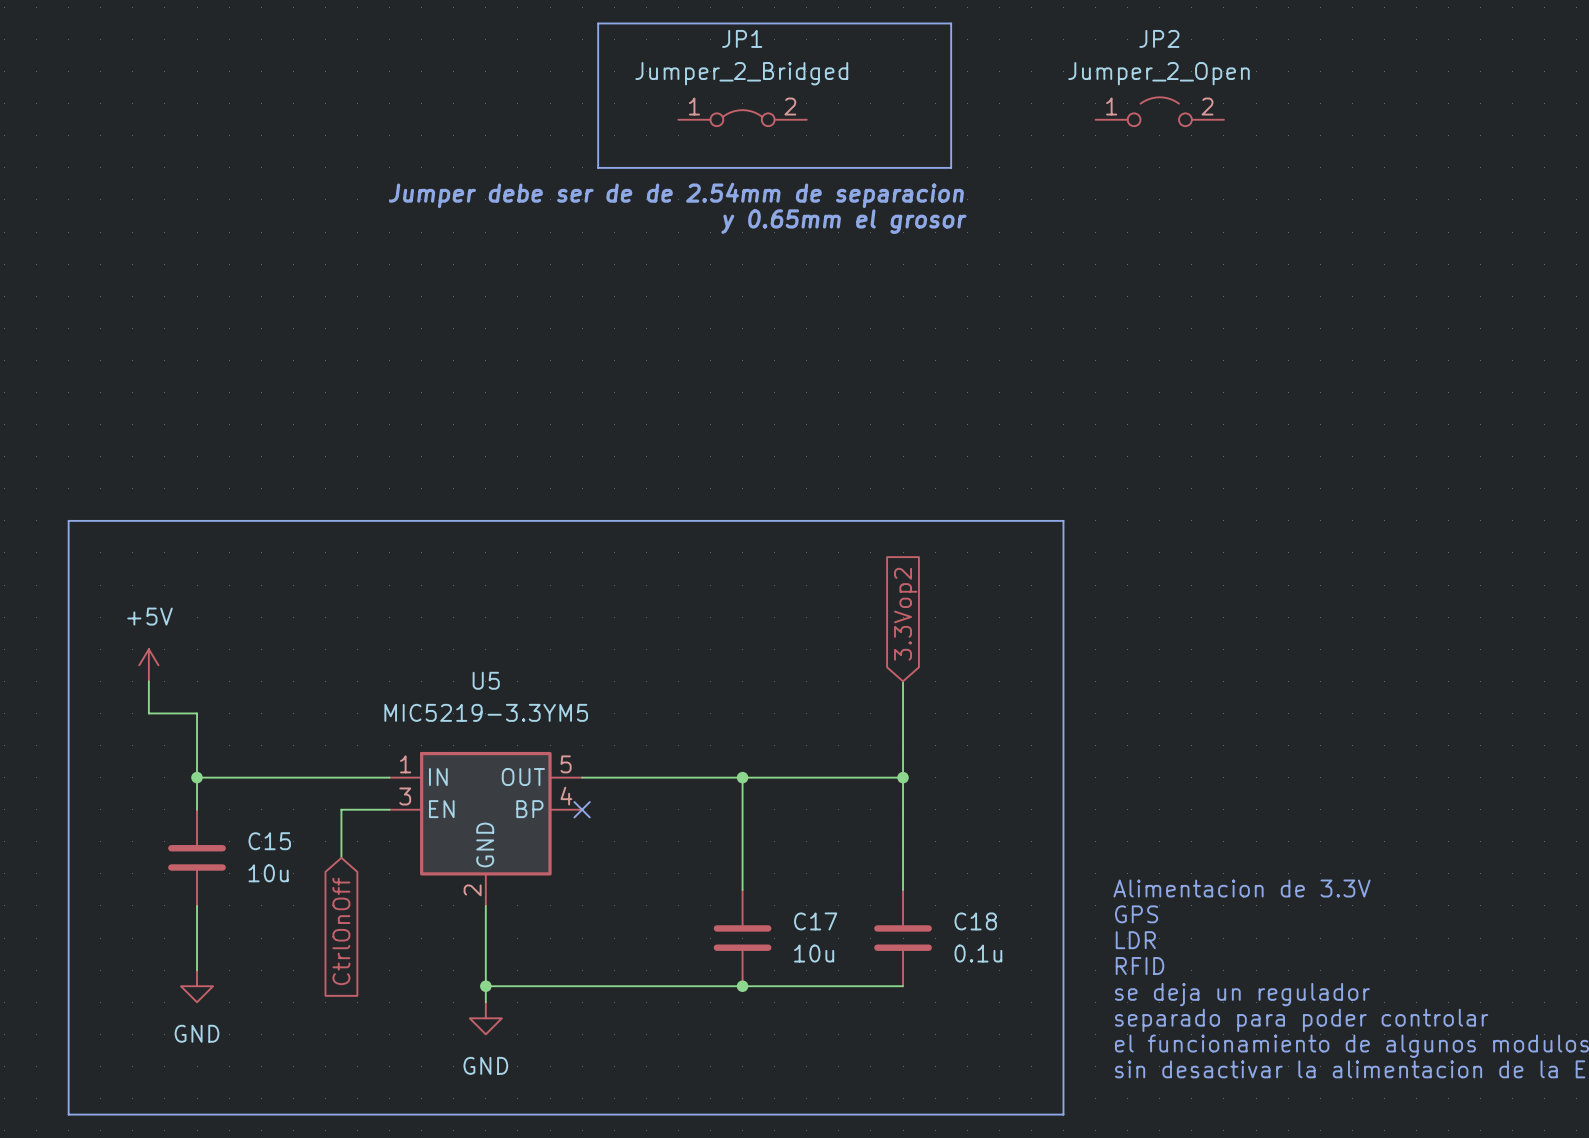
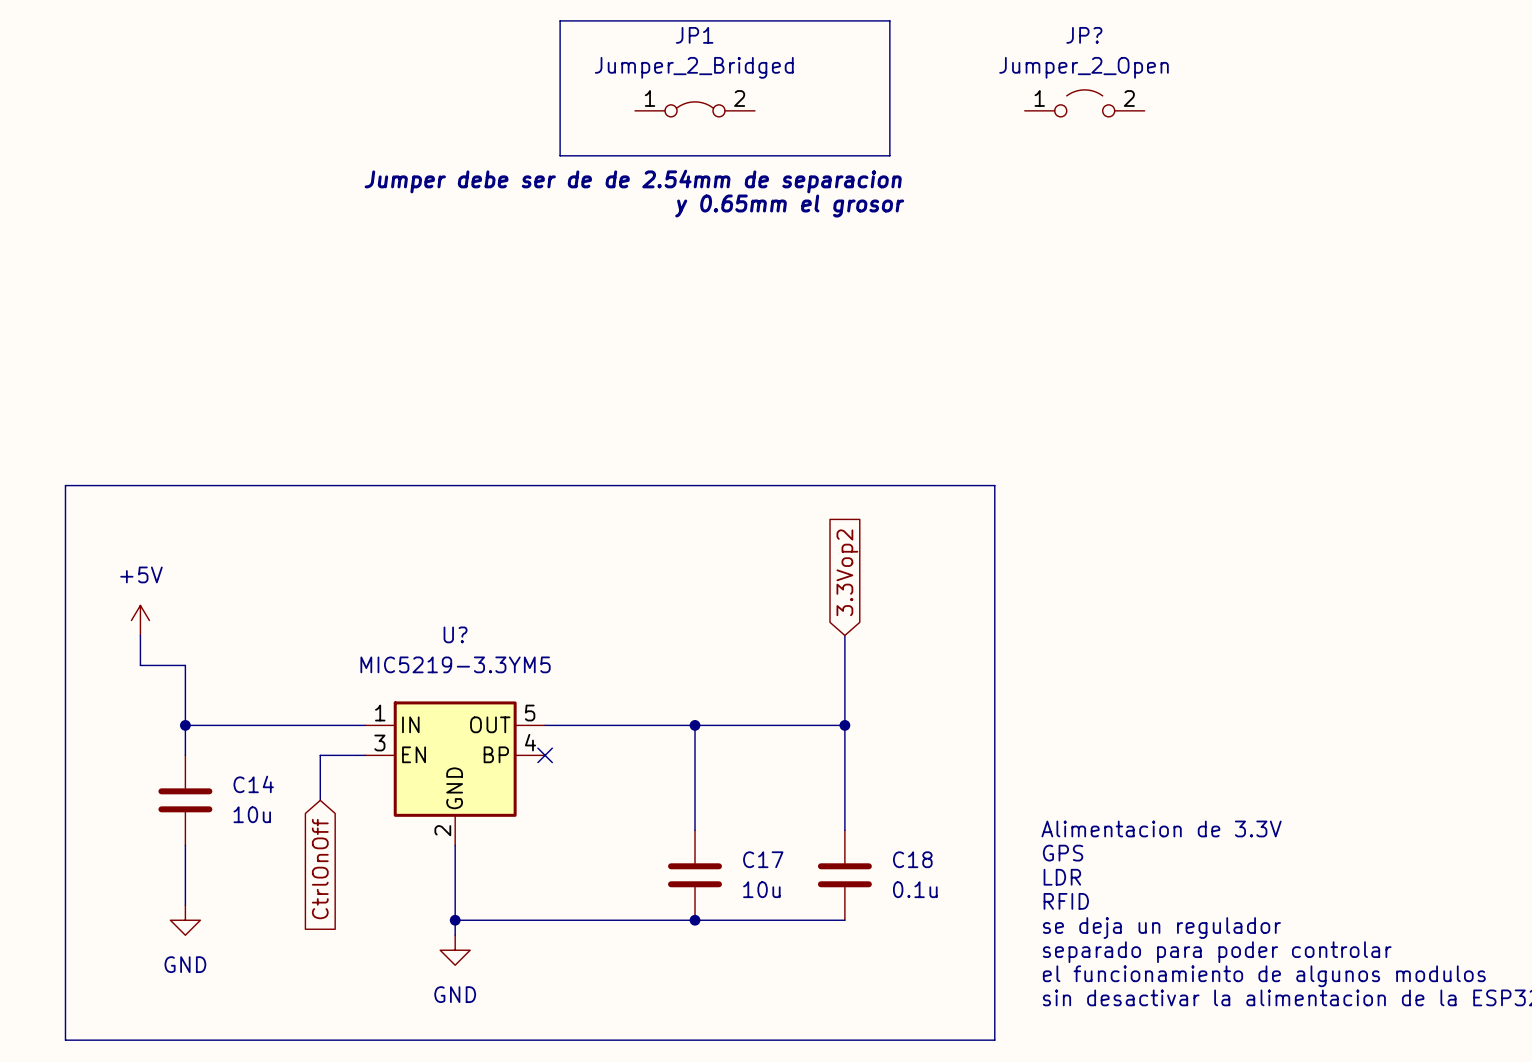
JP2 name: JP2 (1159, 38) -> JP? (1084, 35)
U5 name: U5 (486, 680) -> U? (455, 634)
C15 name: C15 (269, 841) -> C14 (253, 784)

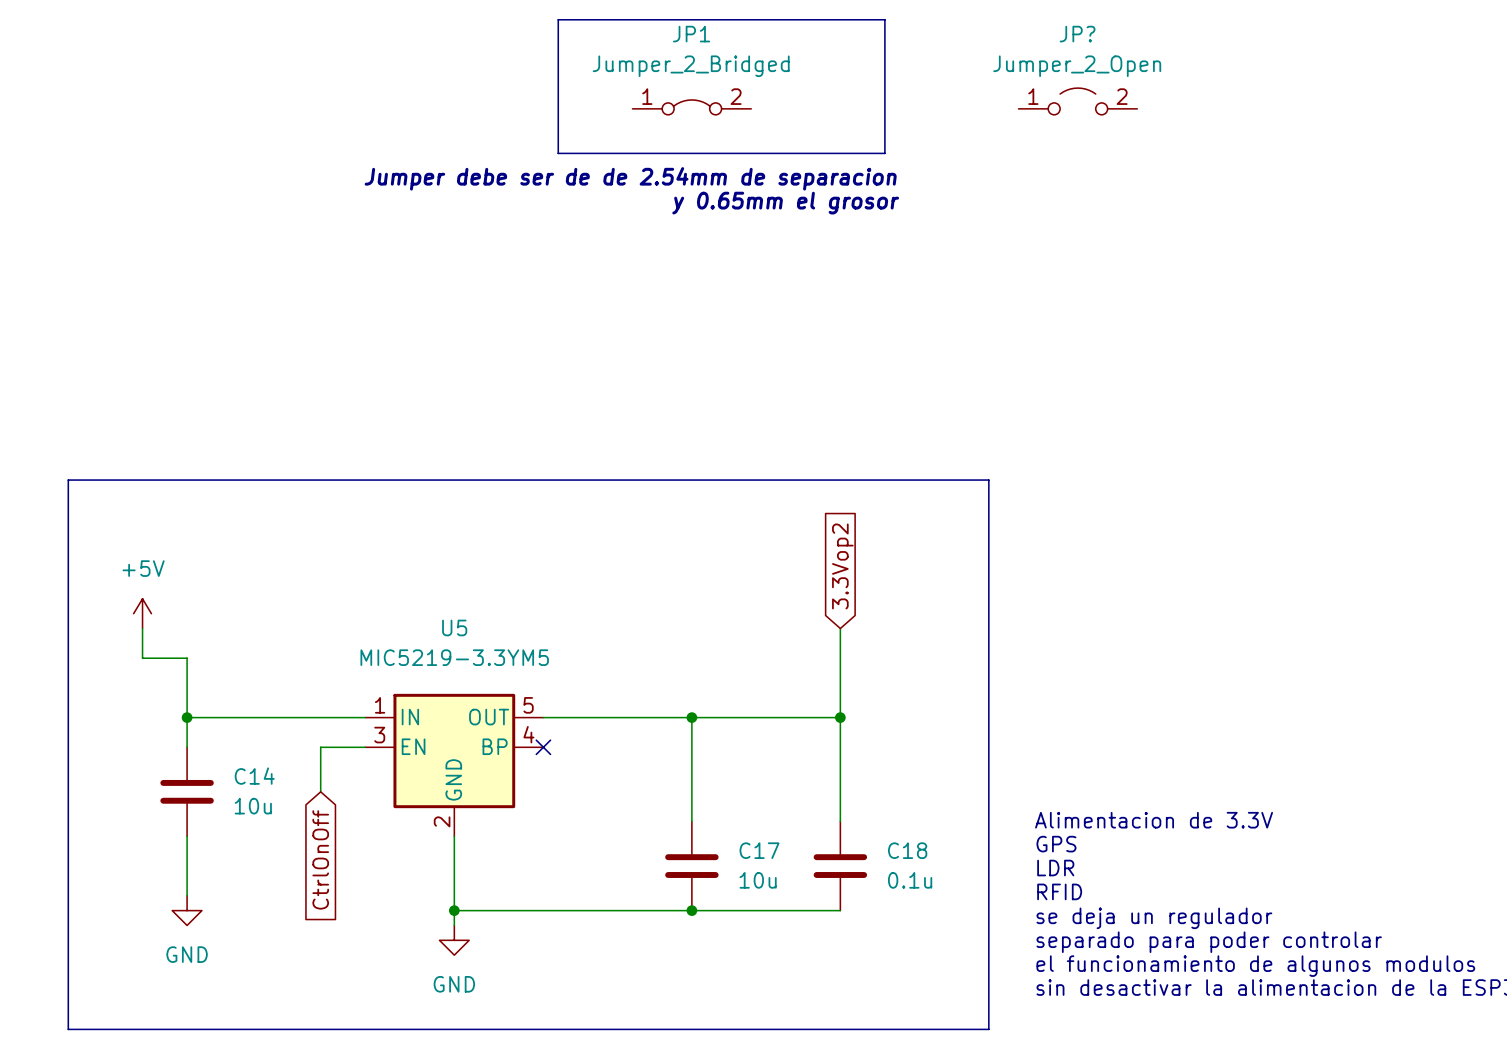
U? name: U? (455, 634) -> U5 (454, 627)

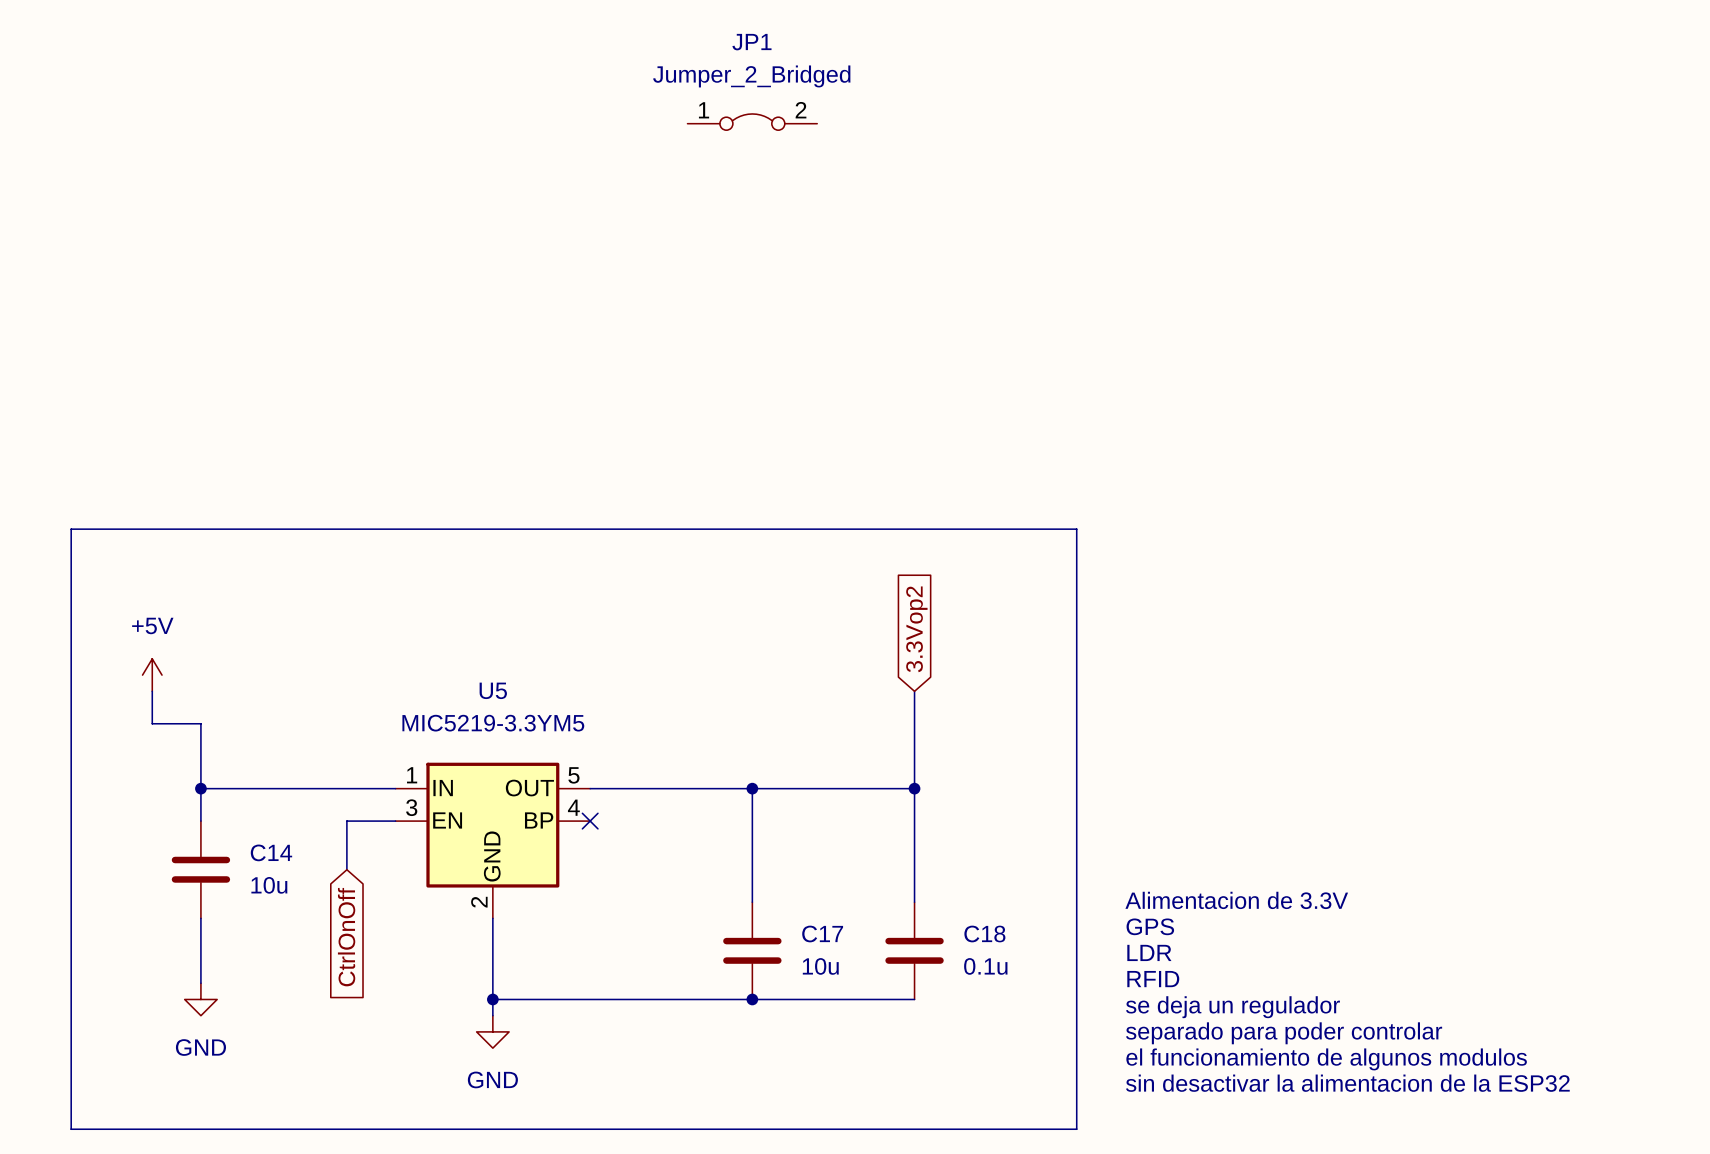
line: (558, 19) (558, 153) (884, 153) (884, 19) (558, 19) -> none
JP?: Jumper_2_Open (1077, 101) -> none
text: Jumper debe ser de de 2.54mm de separacion (630, 178) -> none
text: y 0.65mm el grosor (785, 203) -> none

